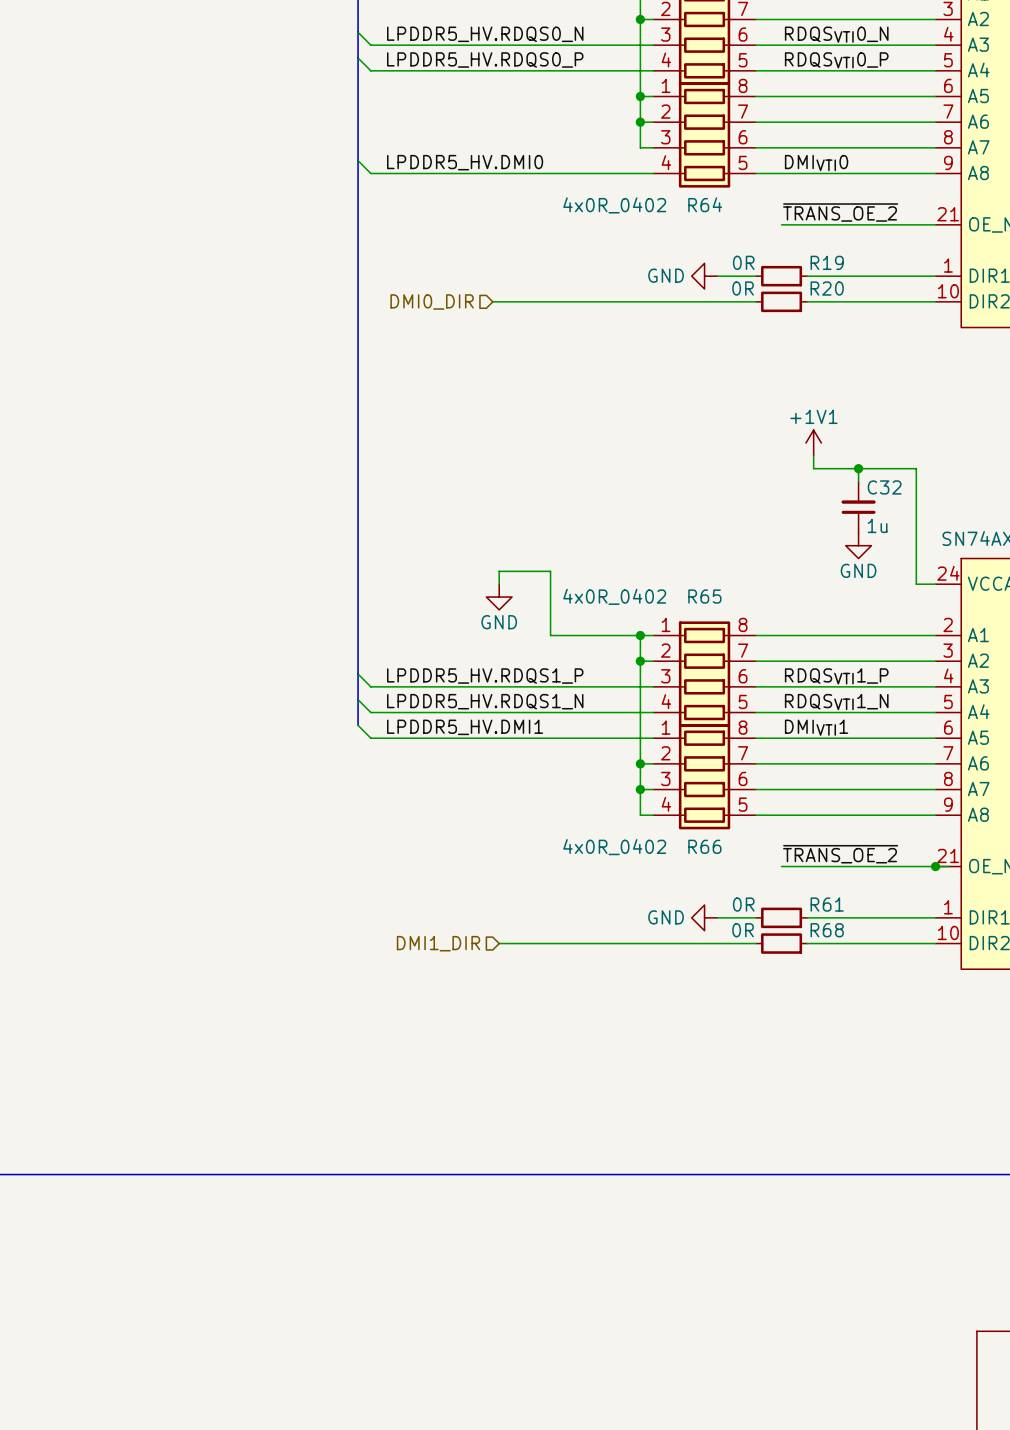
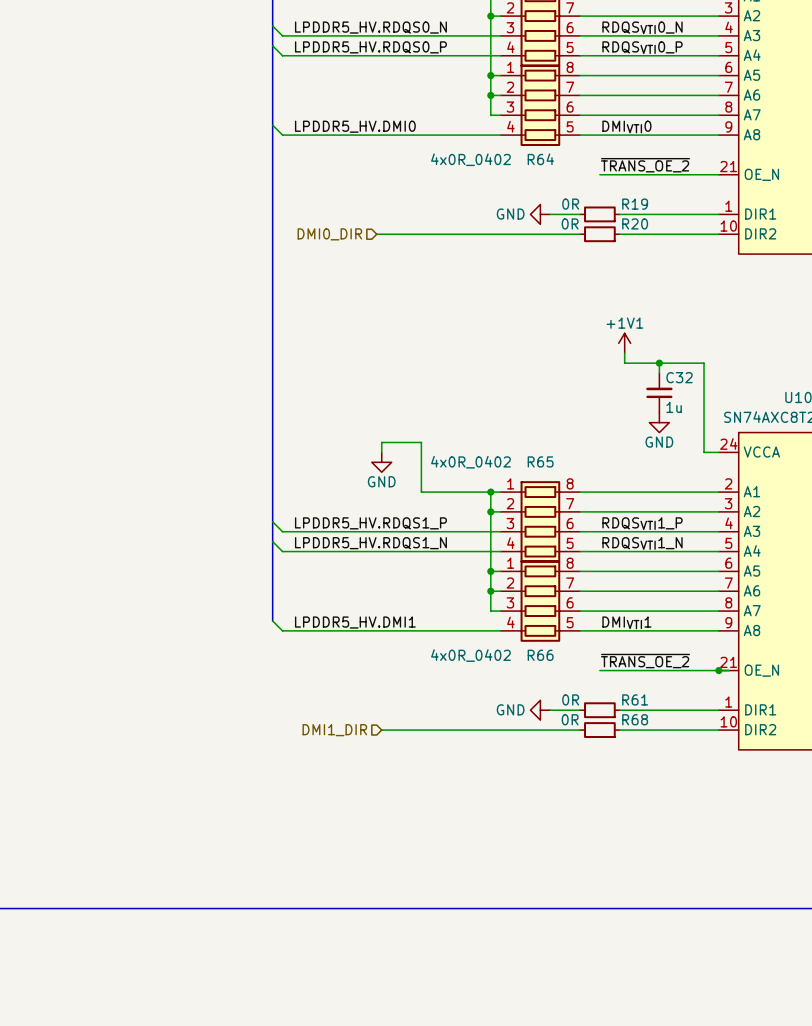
wire: (358, 725) (370, 738) (640, 738) -> none
bus: none -> (272, 561) (272, 620)
label position: LPDDR5_HV.DMI1 (465, 727) -> LPDDR5_HV.DMI1 (355, 622)
label position: DMIVTI1 (816, 727) -> DMIVTI1 (626, 622)
wire: (640, 789) (640, 815) -> (272, 620) (282, 630) (490, 630)
junction position: (640, 789) -> (490, 571)

